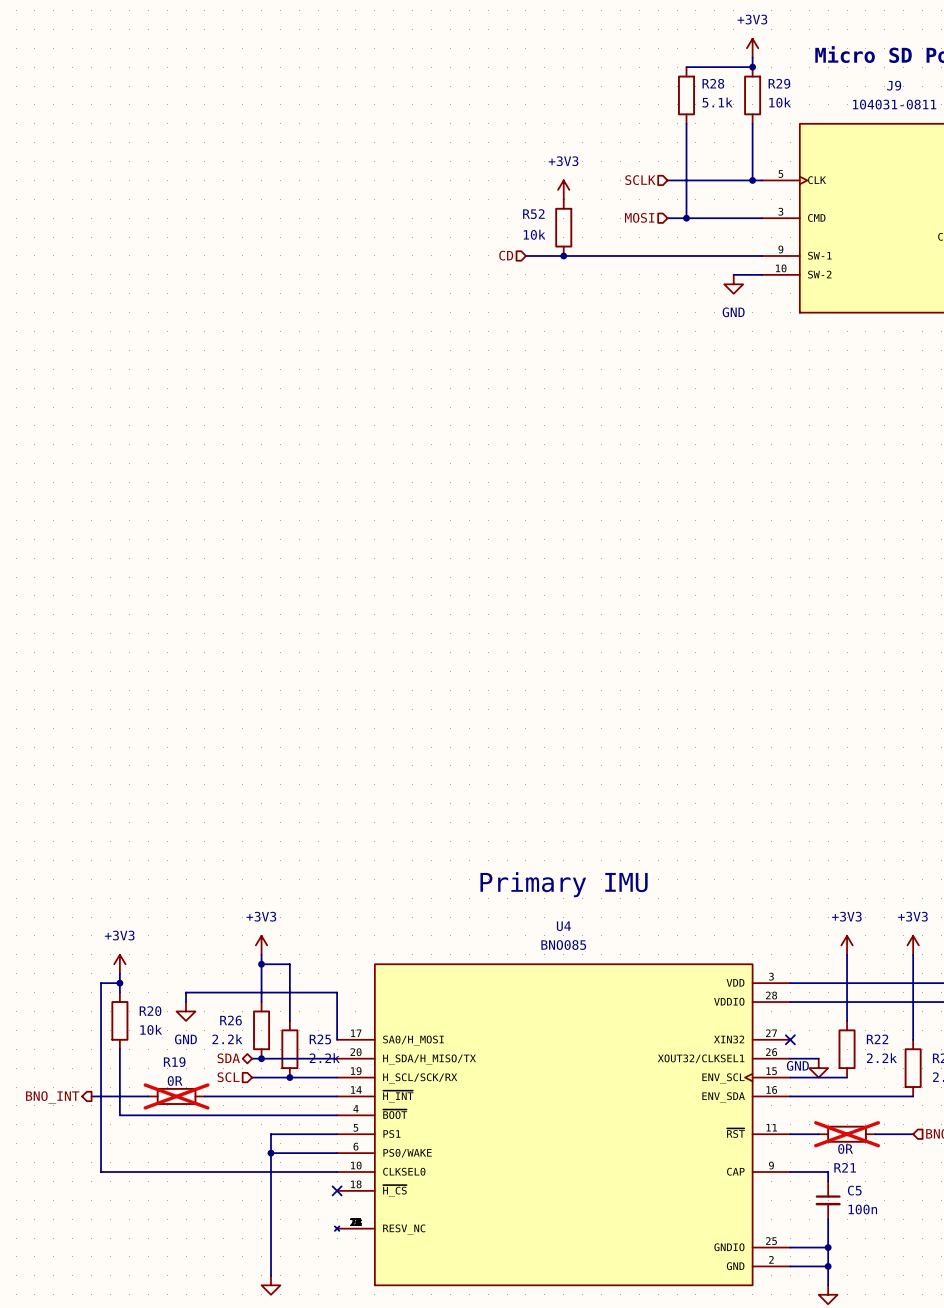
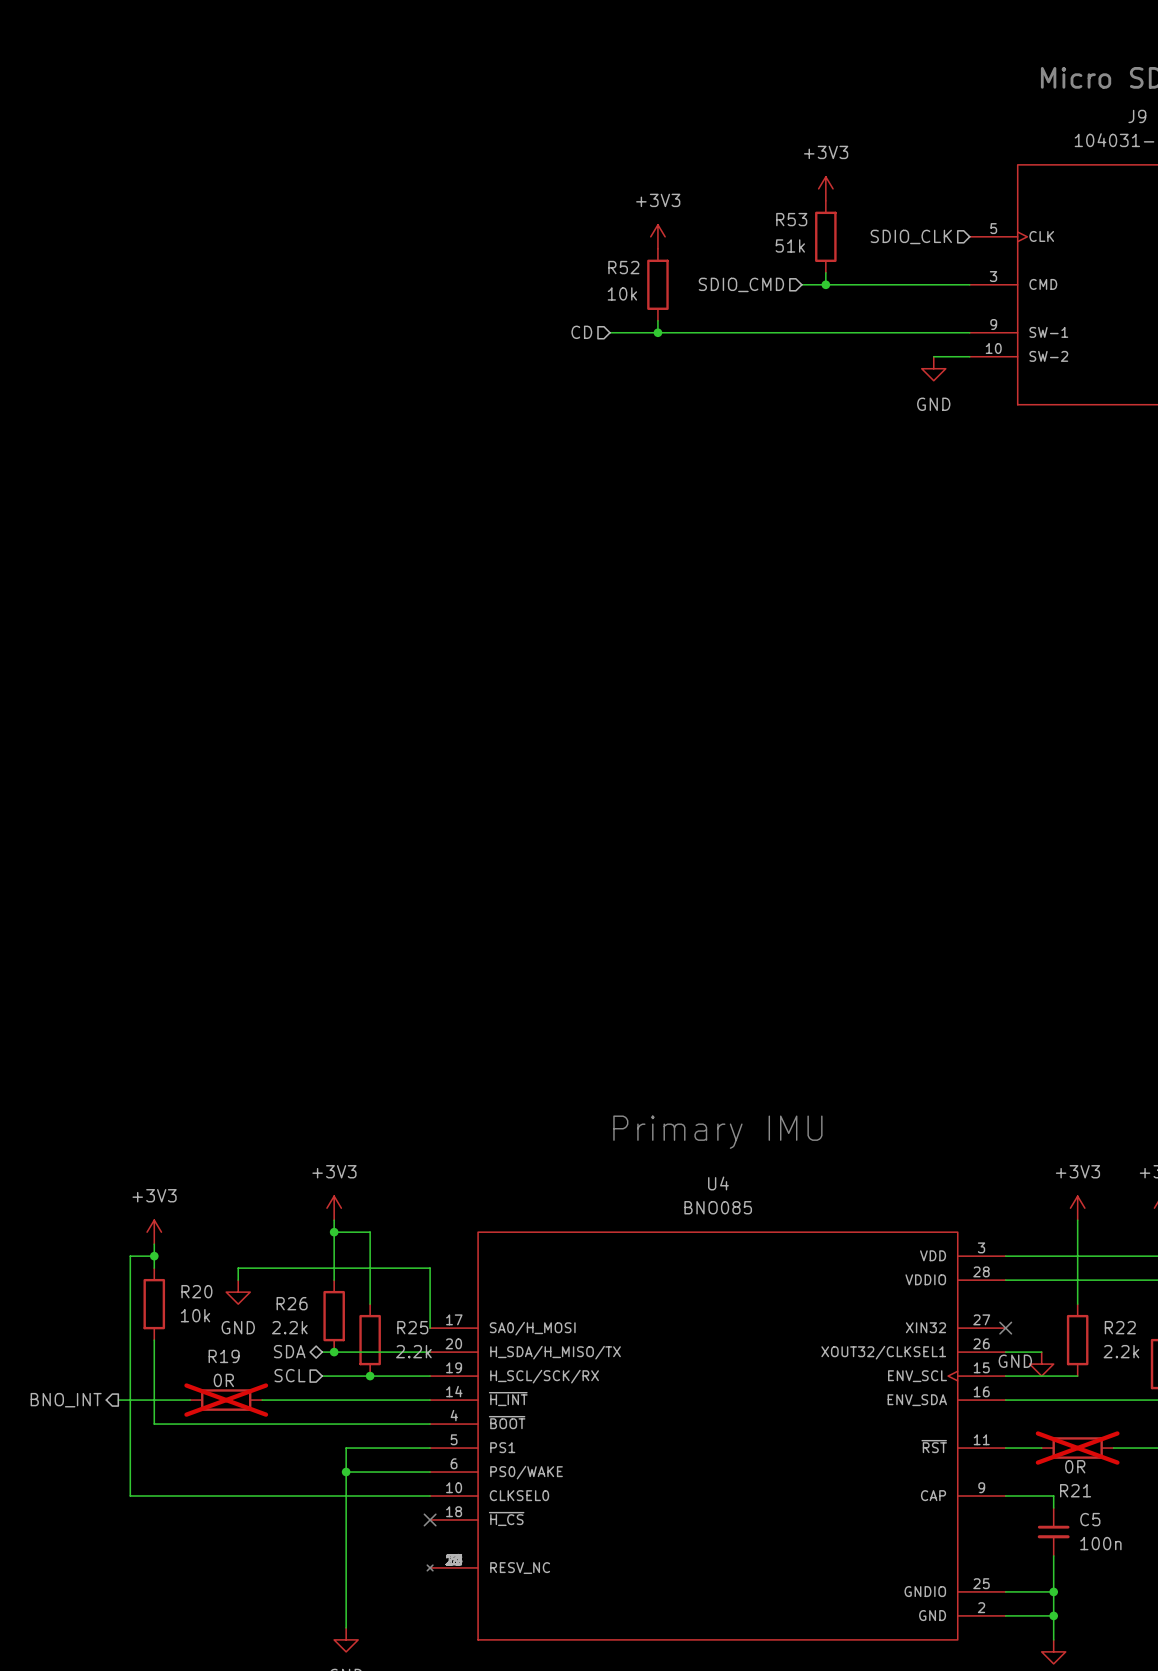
power symbol: +3V3 (752, 48) -> none
wire: (752, 57) (752, 67) (686, 67) -> none
junction: (752, 67) -> none
R28: 5.1k (686, 95) -> none
R29: 10k (752, 95) -> none
wire: (686, 123) (686, 218) -> none
wire: (752, 123) (752, 180) -> none
power symbol: none -> +3V3 (825, 188)
hierarchical label: SCLK (640, 180) -> none
R53: none -> 51k (825, 236)
wire: (667, 180) (762, 180) -> none
junction: (752, 180) -> none
hierarchical label: none -> SDIO_CLK (911, 236)
power symbol position: +3V3 (563, 189) -> +3V3 (657, 236)
wire: none -> (825, 272) (825, 284)
hierarchical label: MOSI (639, 217) -> none
wire: none -> (801, 284) (849, 284)
junction position: (686, 218) -> (825, 284)
hierarchical label: none -> SDIO_CMD (741, 284)
R52 position: (563, 227) -> (657, 284)
wire: none -> (609, 332) (669, 332)
hierarchical label position: CD (506, 255) -> CD (581, 332)
junction: none -> (657, 332)
junction: (563, 255) -> none

